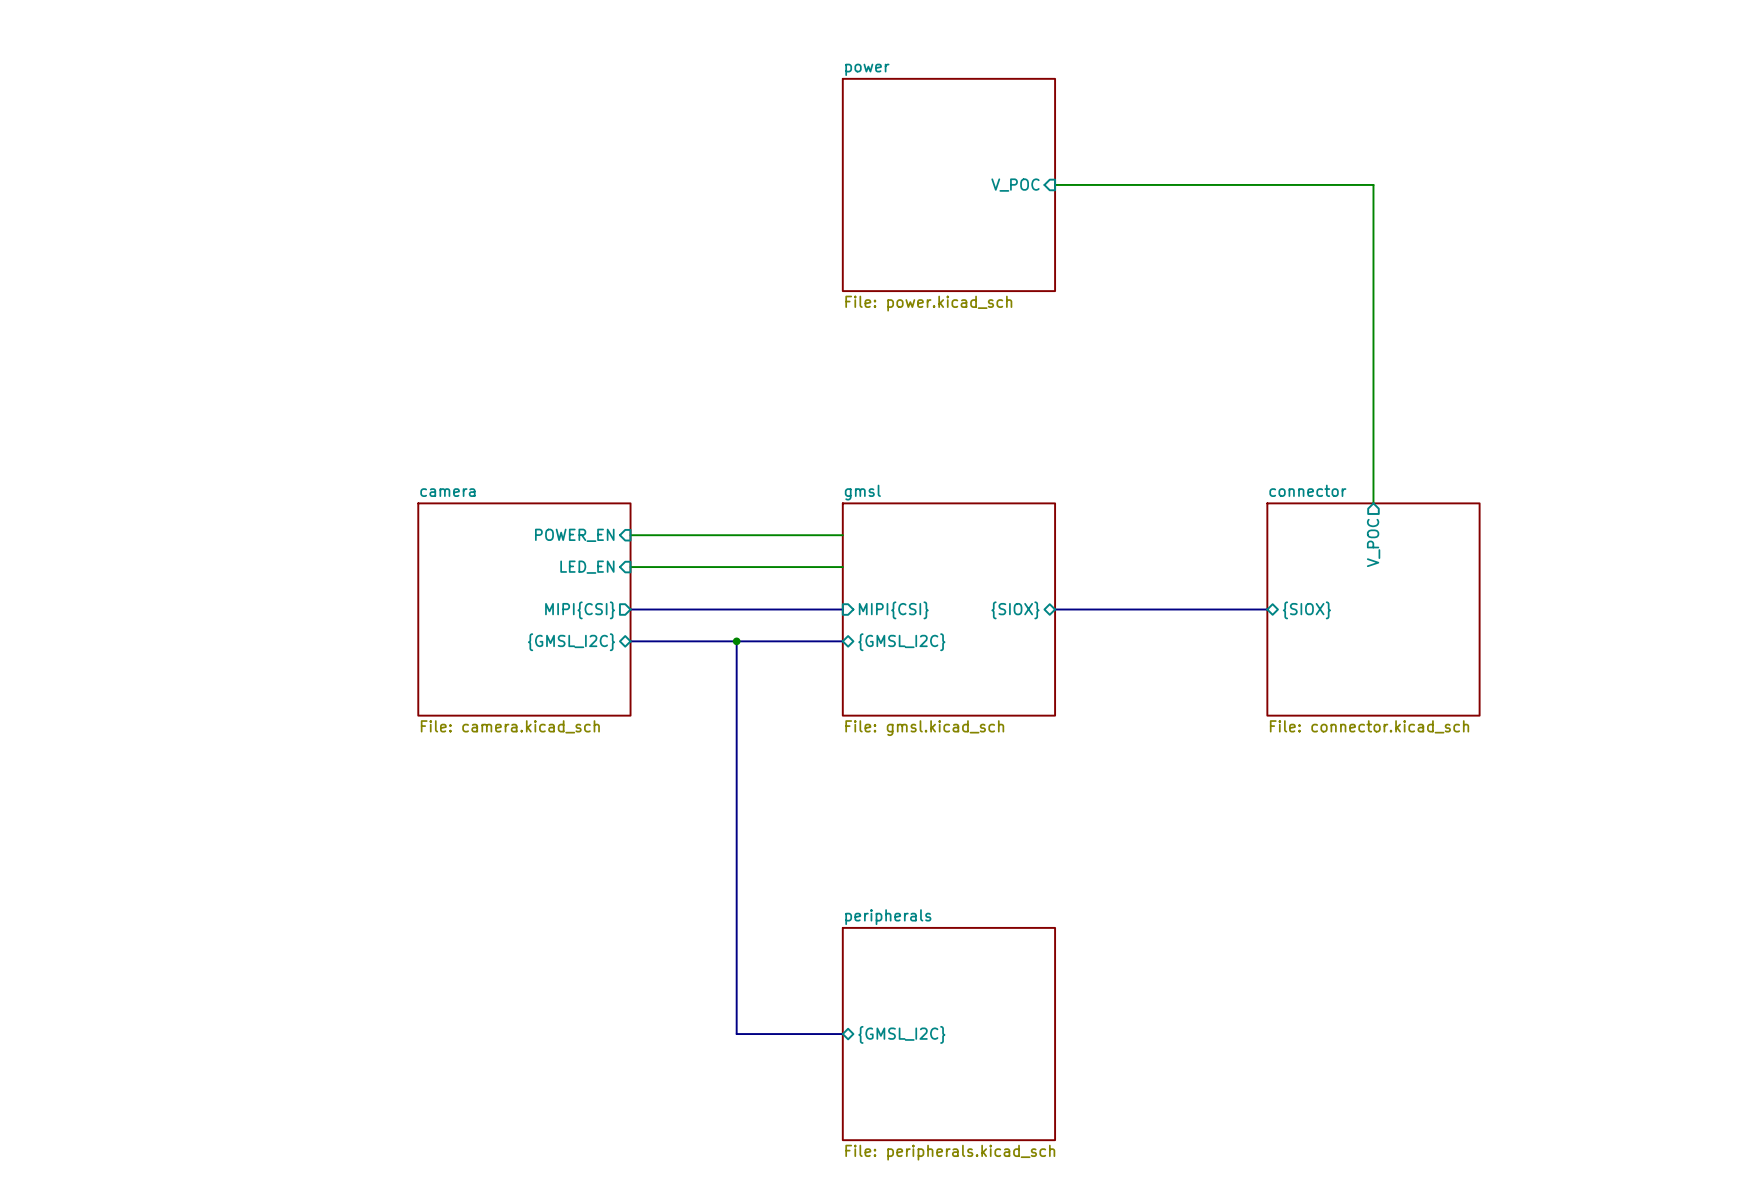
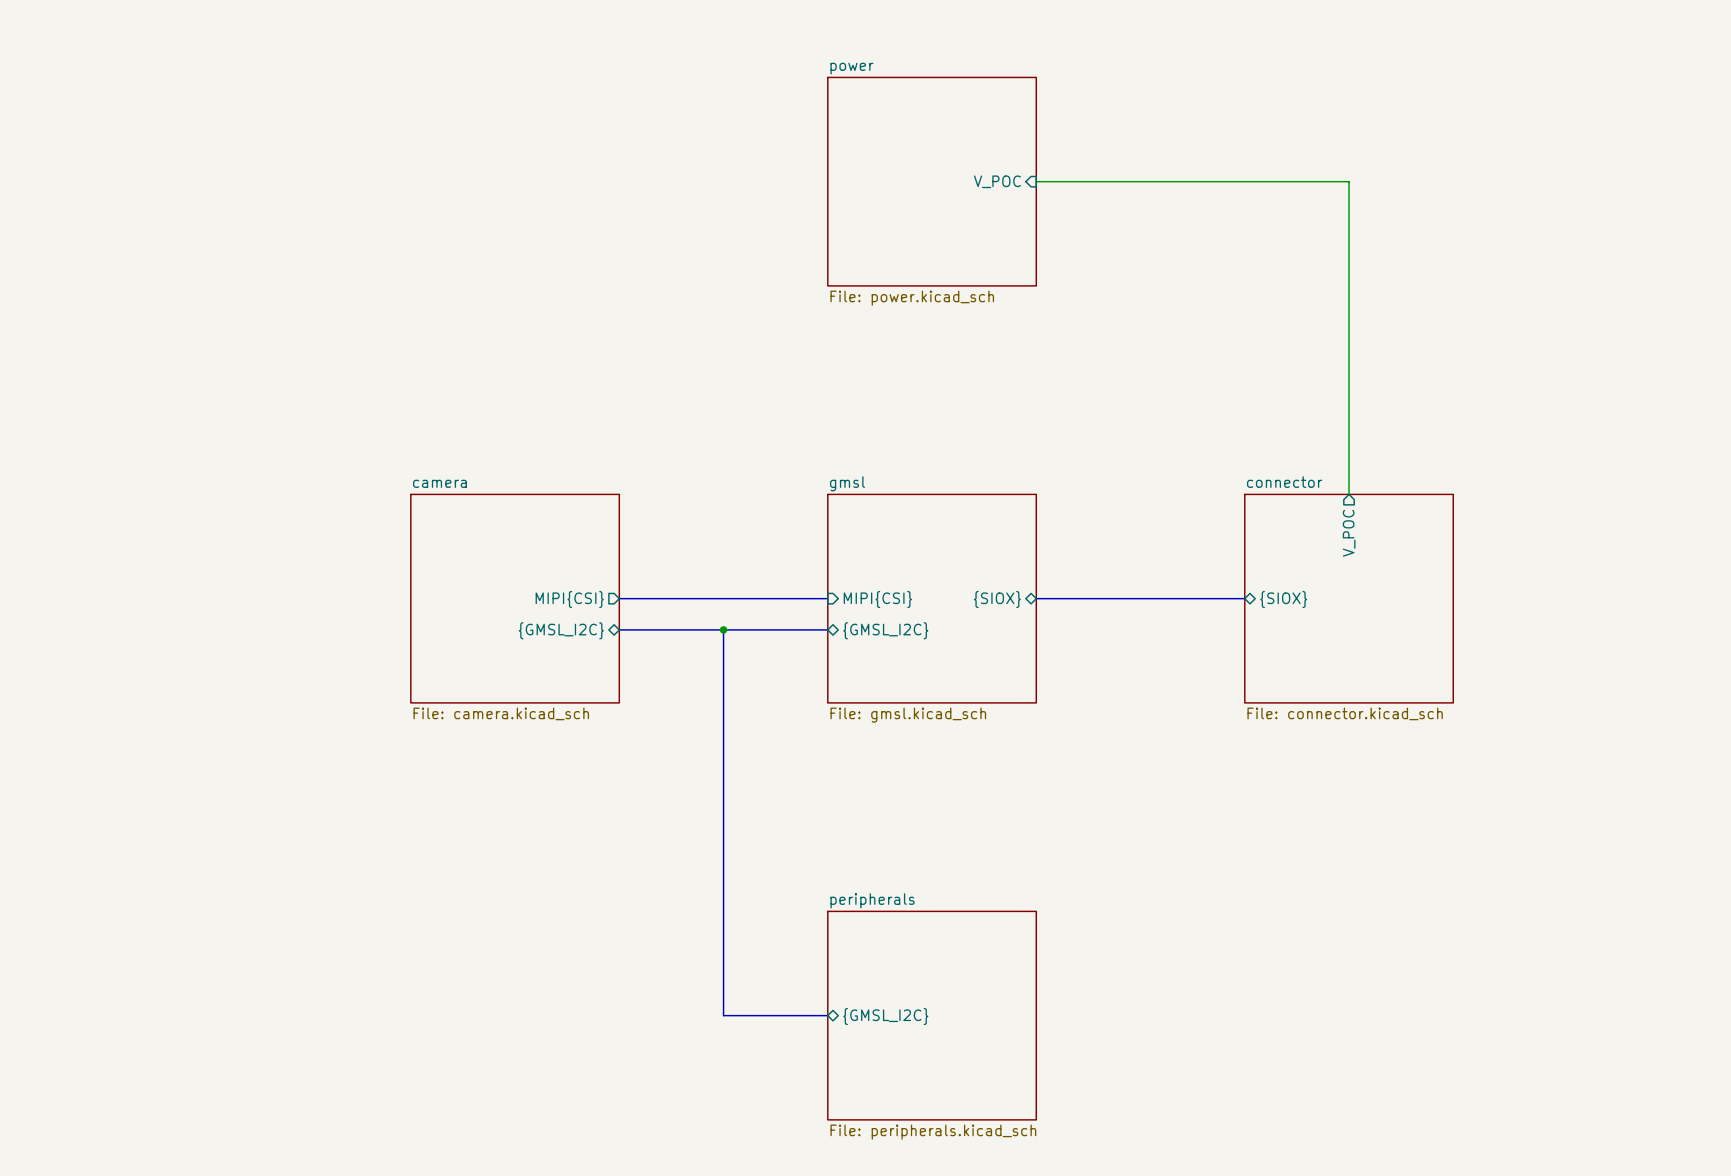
sheet pin: POWER_EN (574, 535) -> none
wire: (630, 535) (842, 535) -> none
sheet pin: LED_EN (587, 567) -> none
wire: (630, 567) (842, 567) -> none

